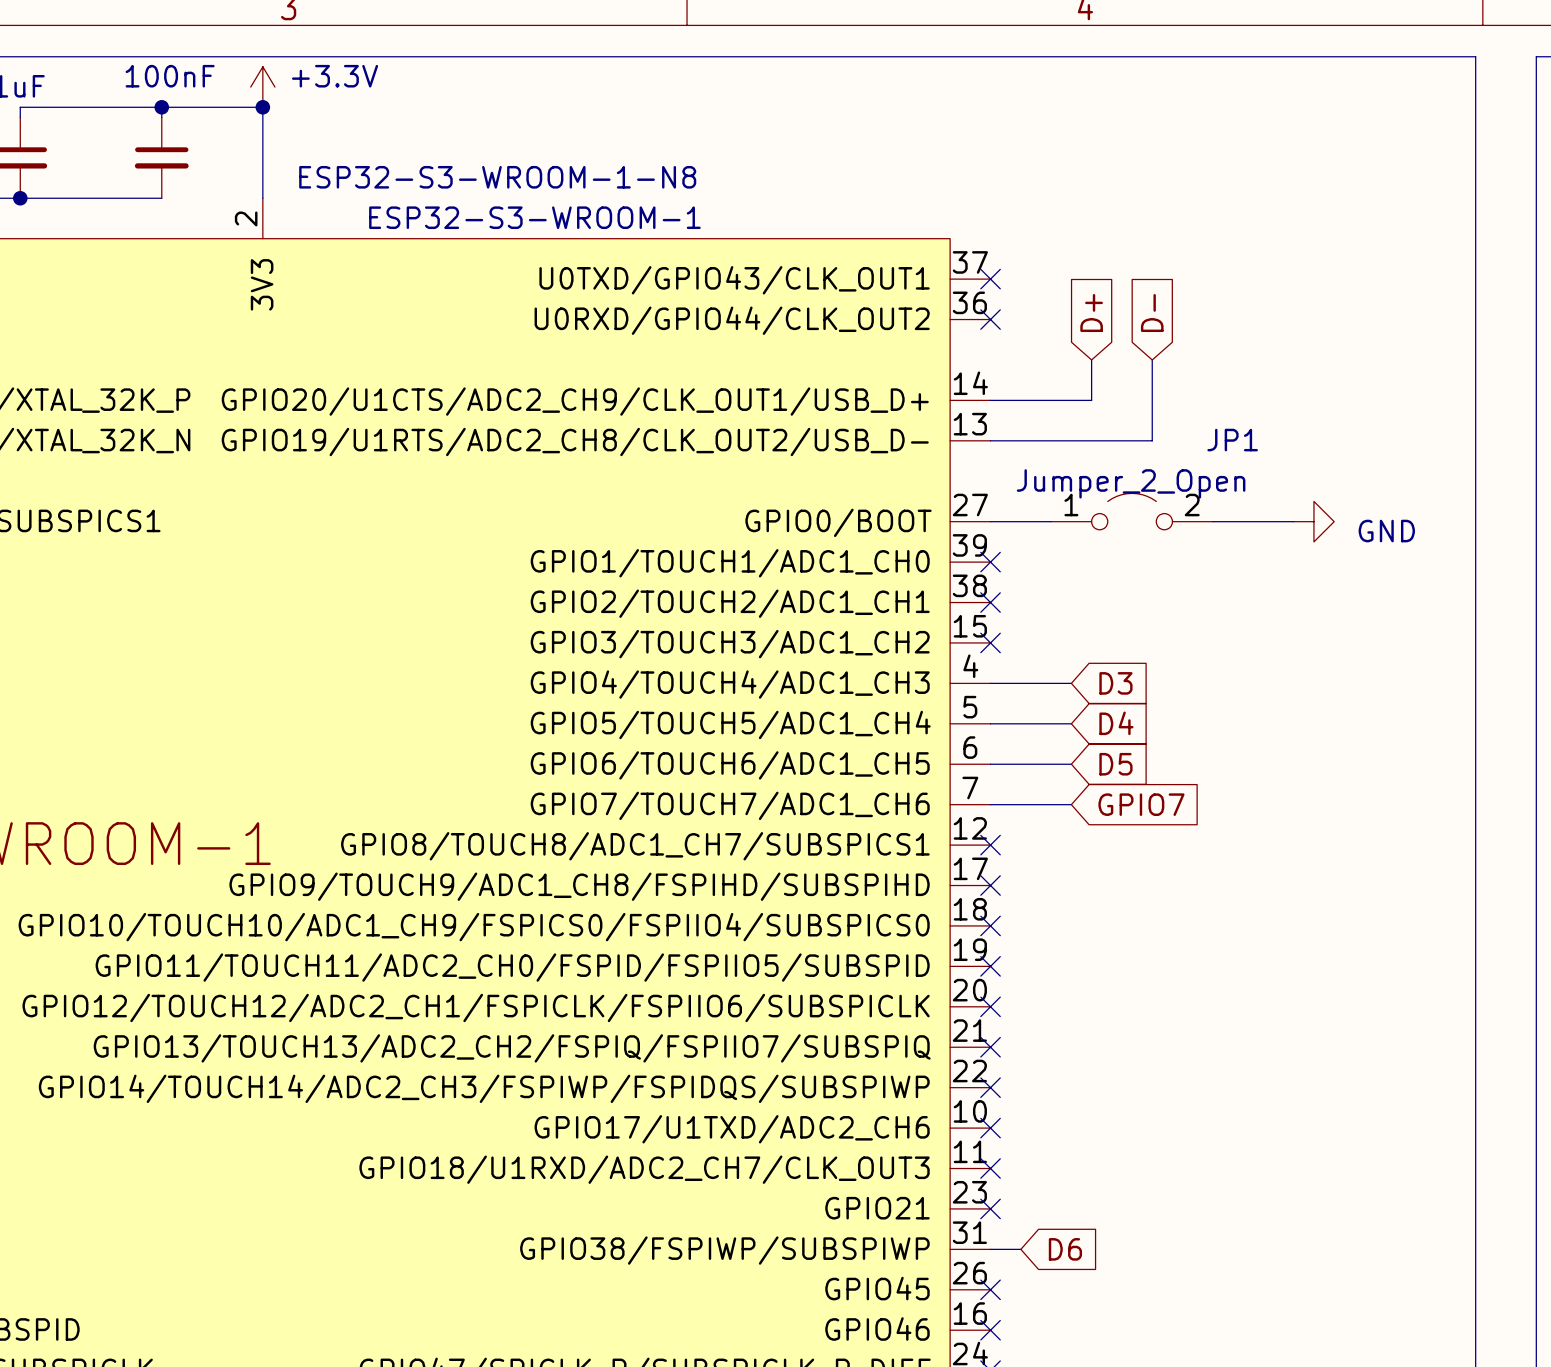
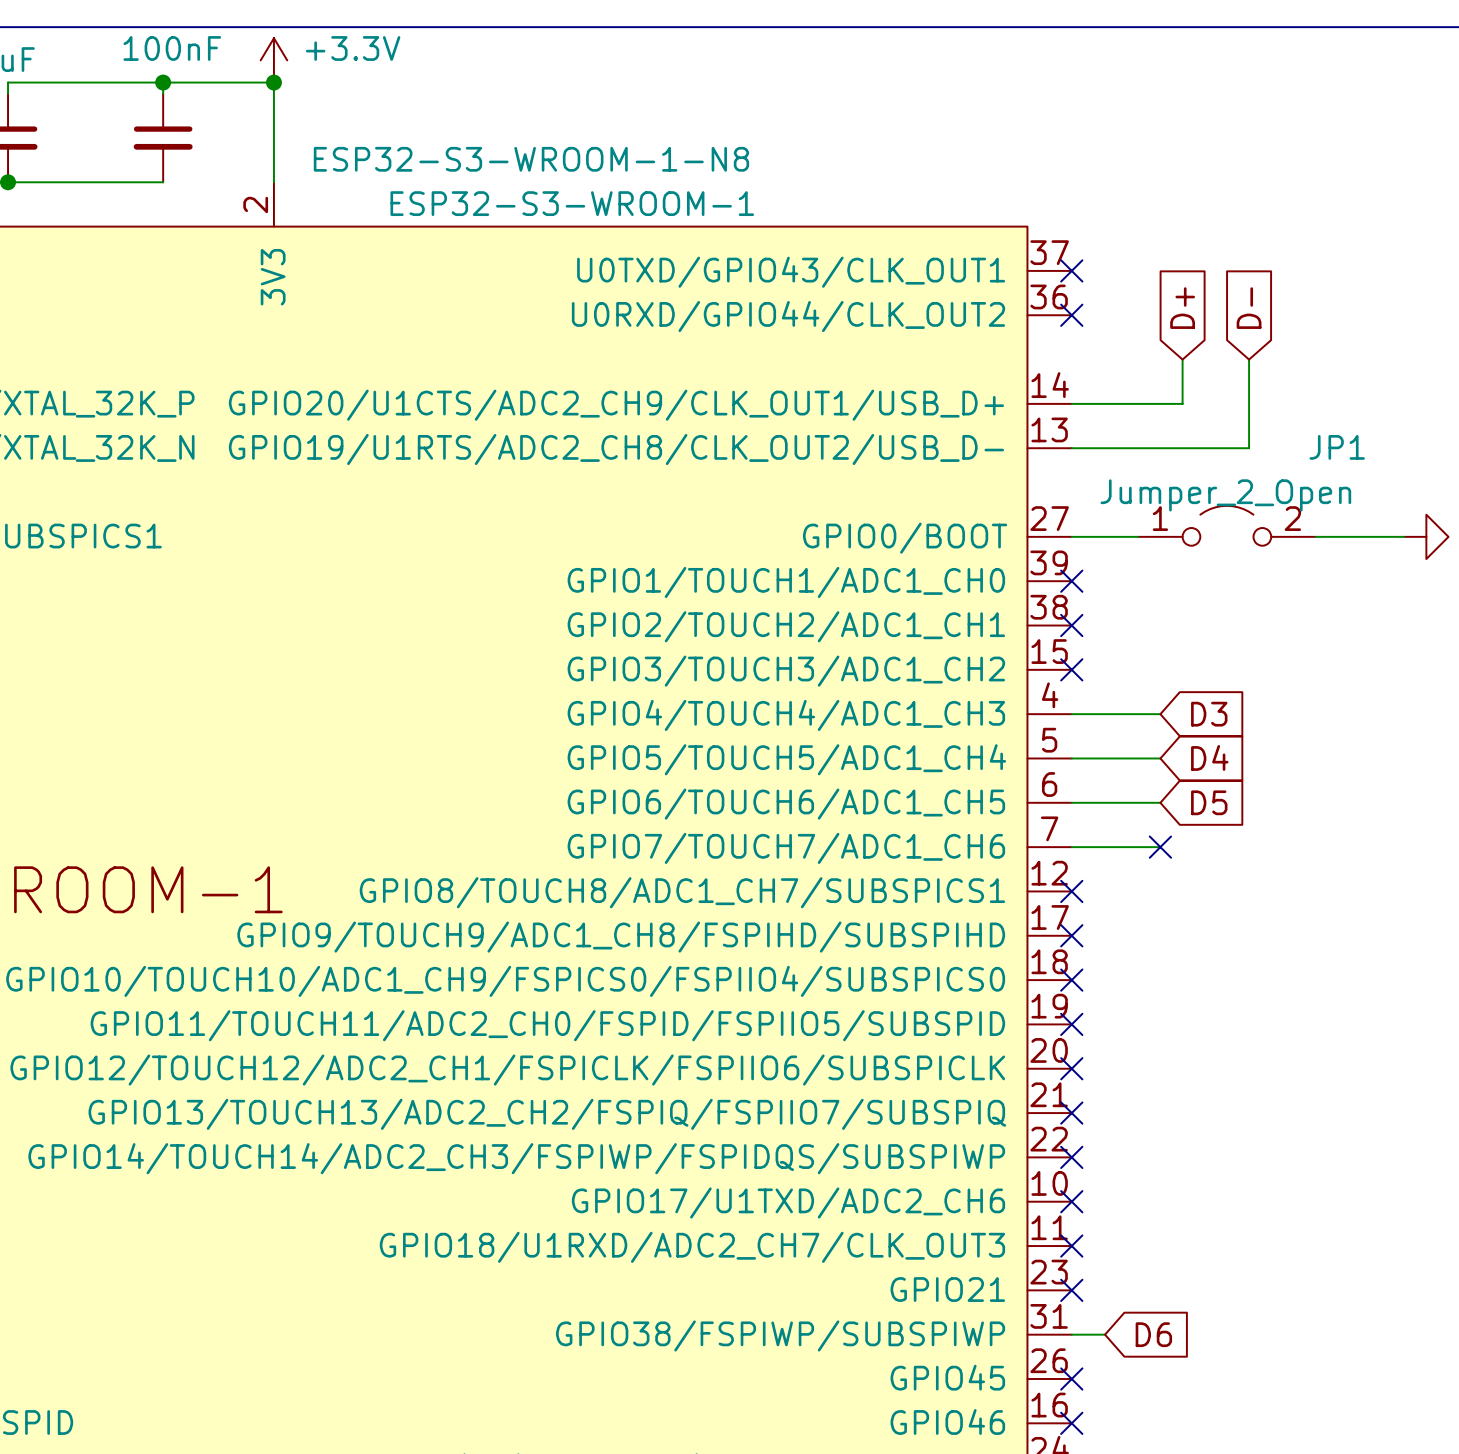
no-connect mark: none -> (1160, 847)
global label: GPIO7 (1141, 804) -> none

